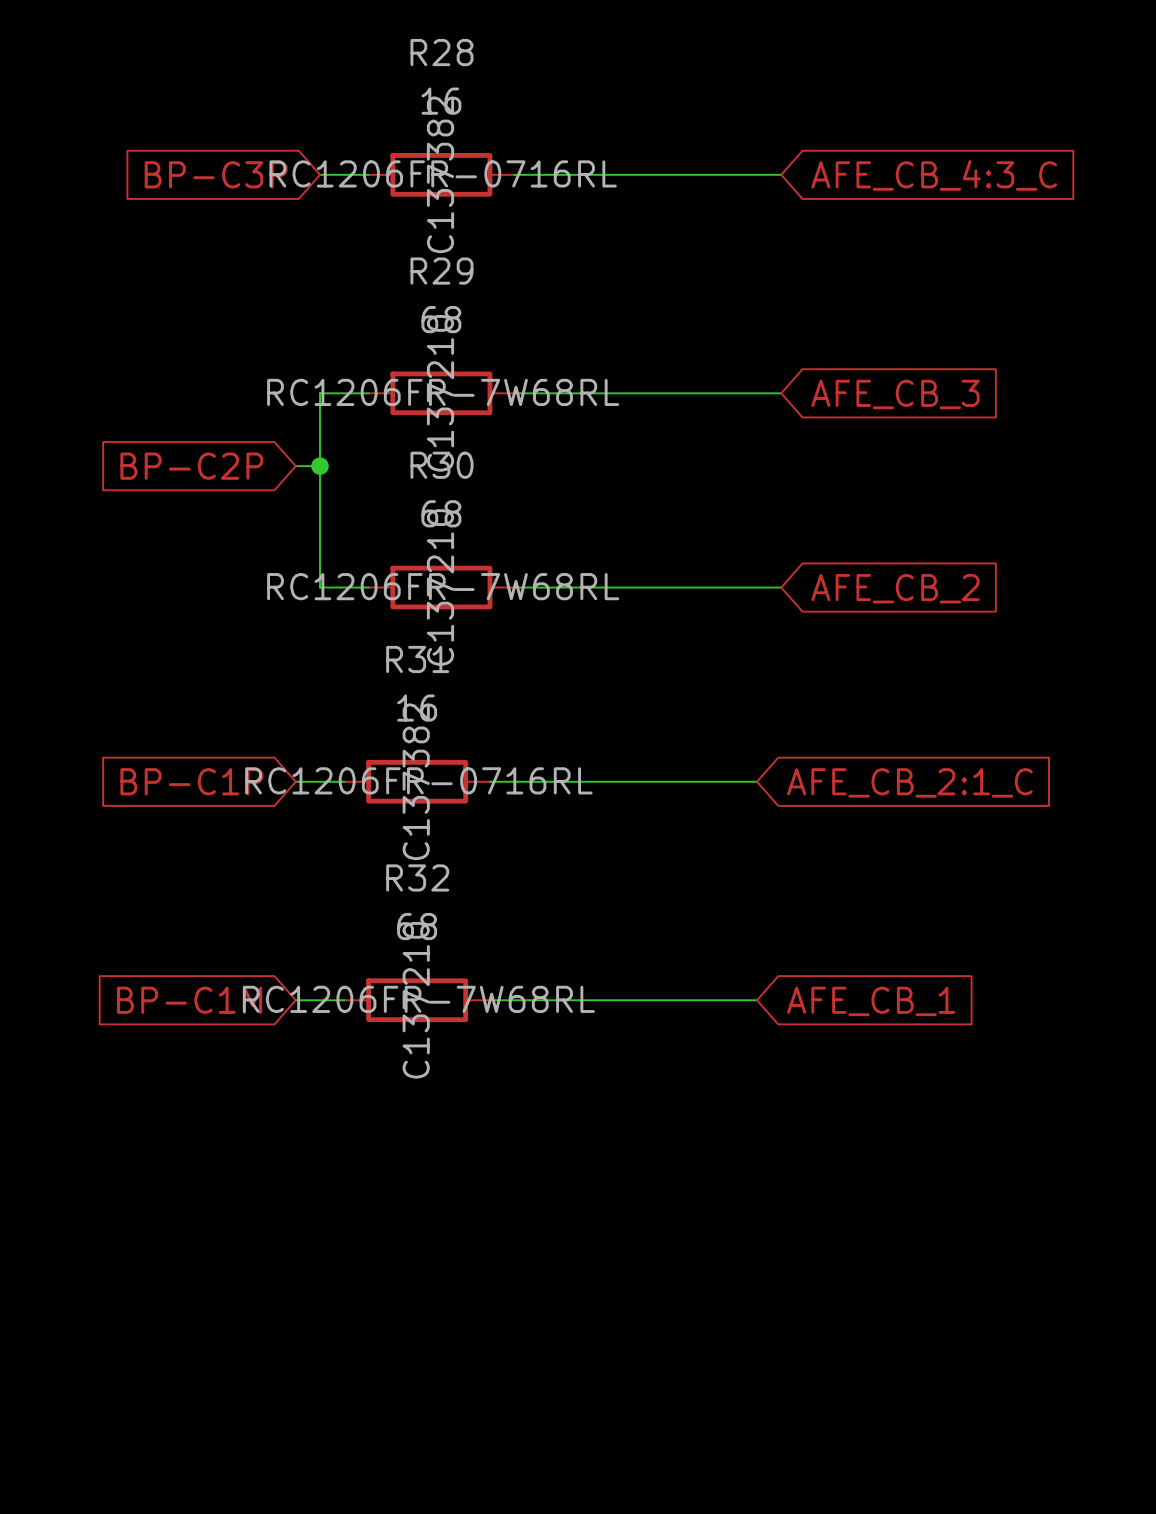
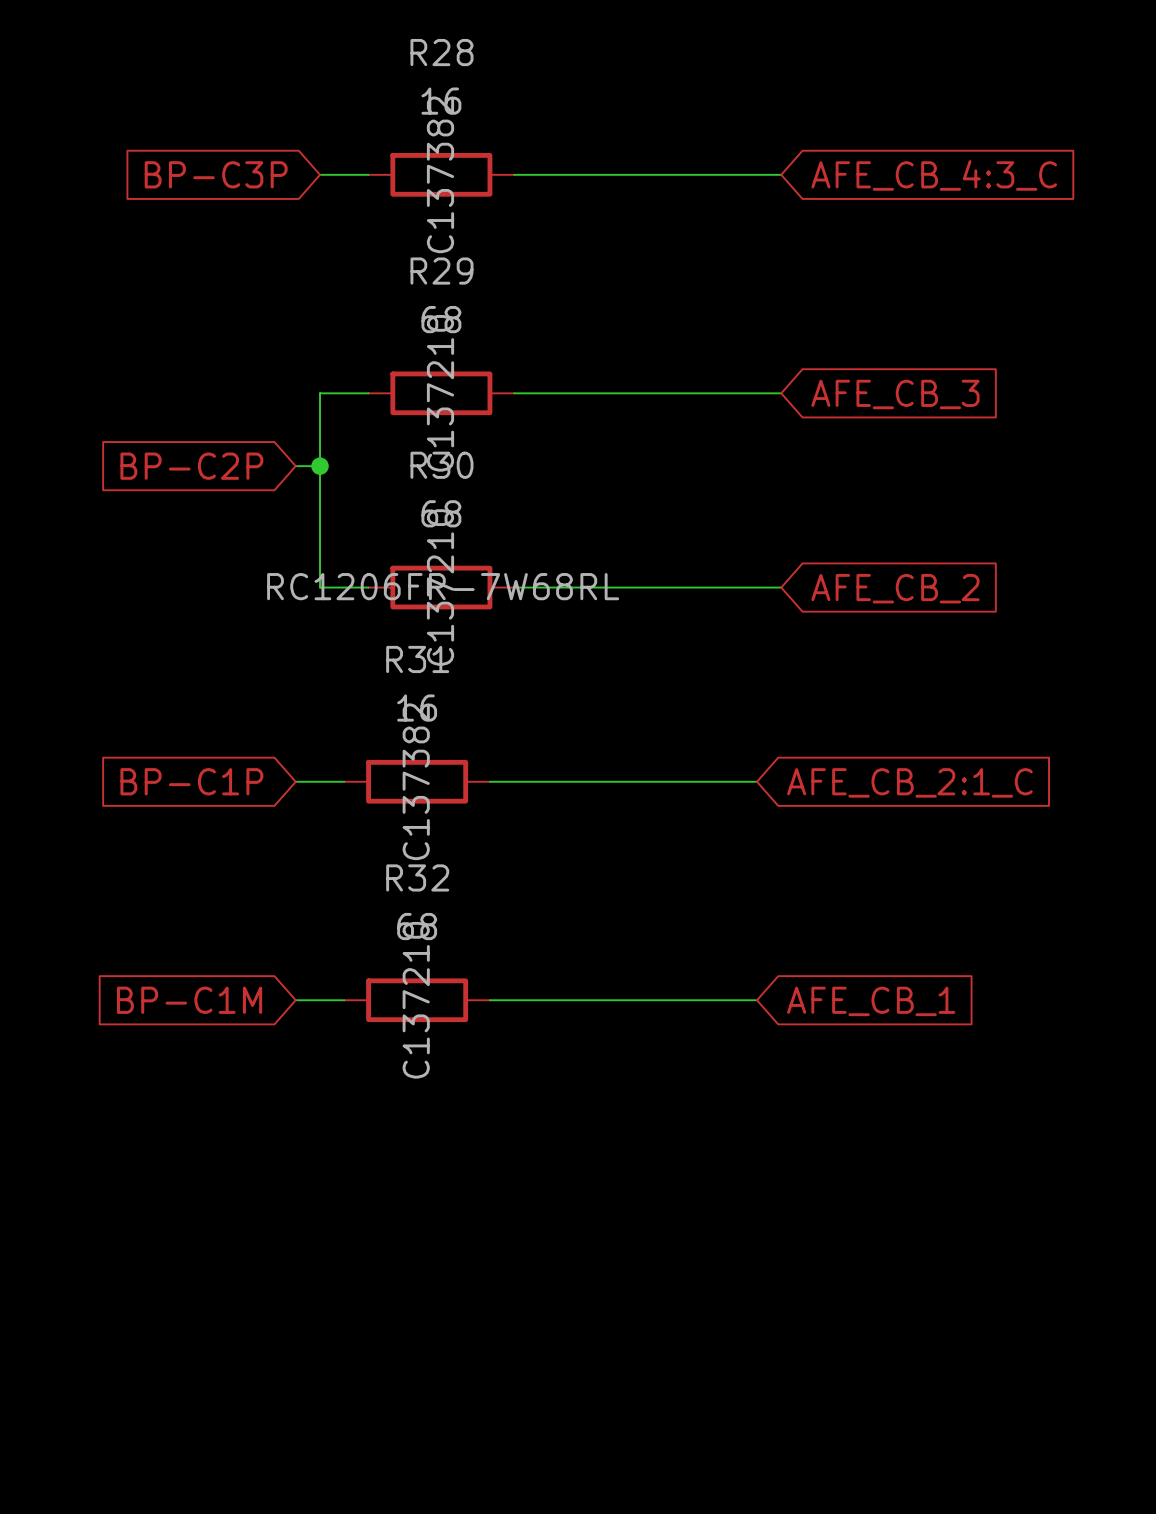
R28 text: RC1206FR-0716RL (443, 173) -> none
R29 text: RC1206FR-7W68RL (443, 392) -> none
R31 text: RC1206FR-0716RL (418, 780) -> none
R32 text: RC1206FR-7W68RL (418, 999) -> none

